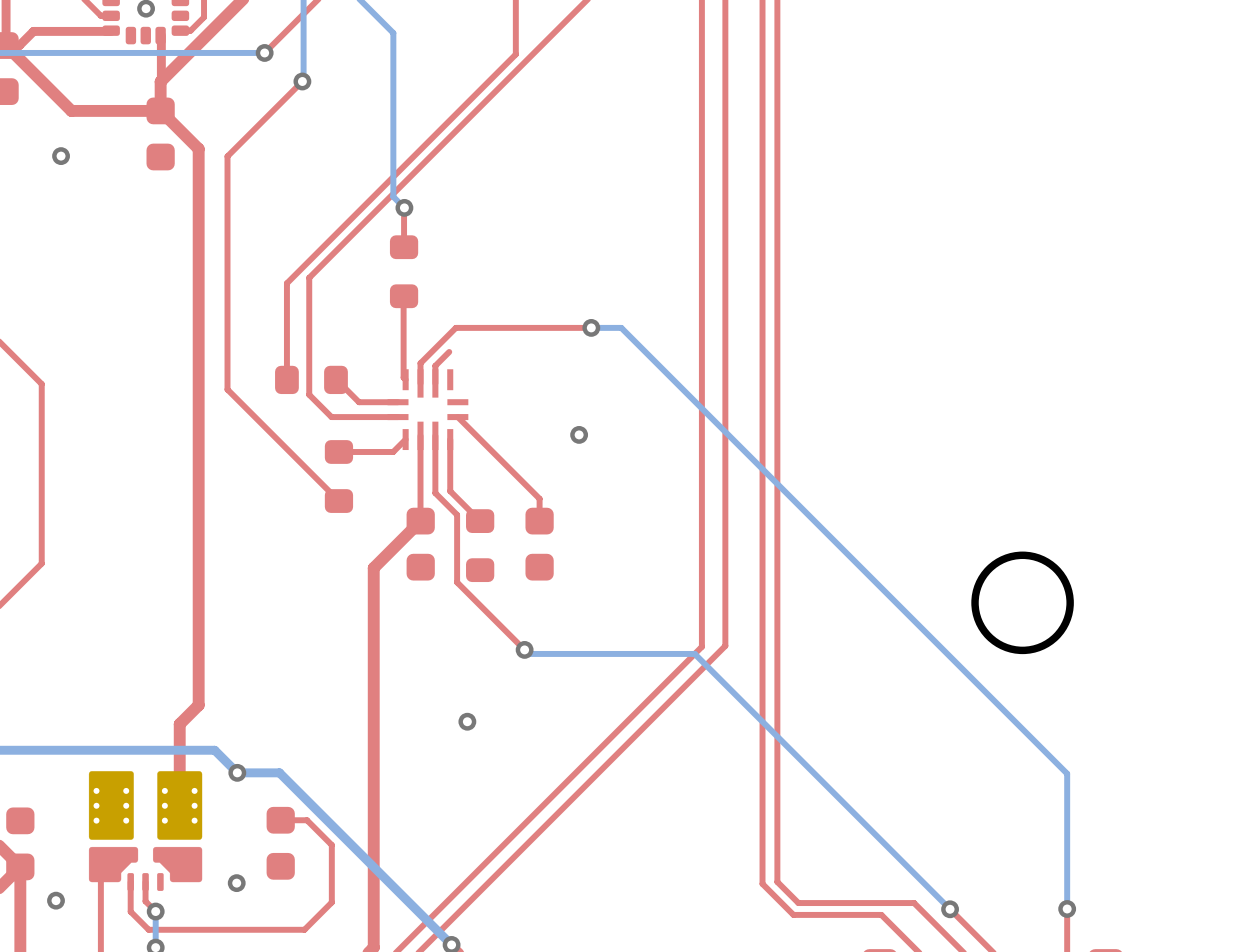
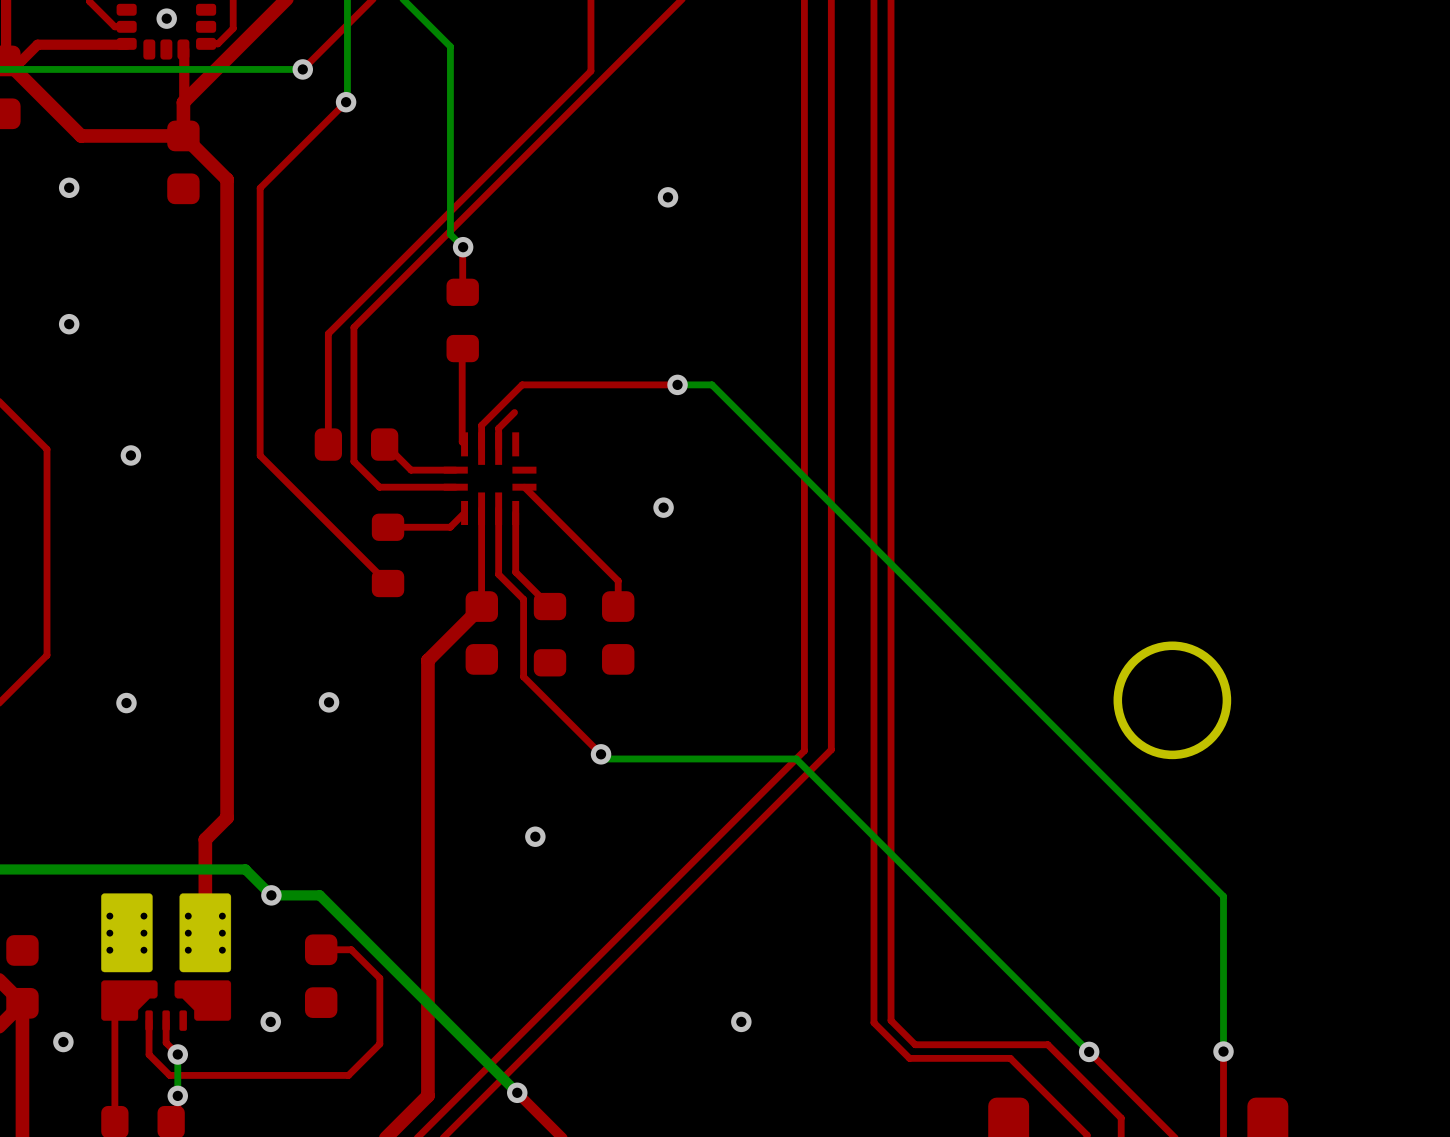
via: none -> (668, 197)
via: none -> (69, 324)
via: none -> (130, 455)
via: none -> (329, 702)
via: none -> (126, 703)
via: none -> (741, 1021)

